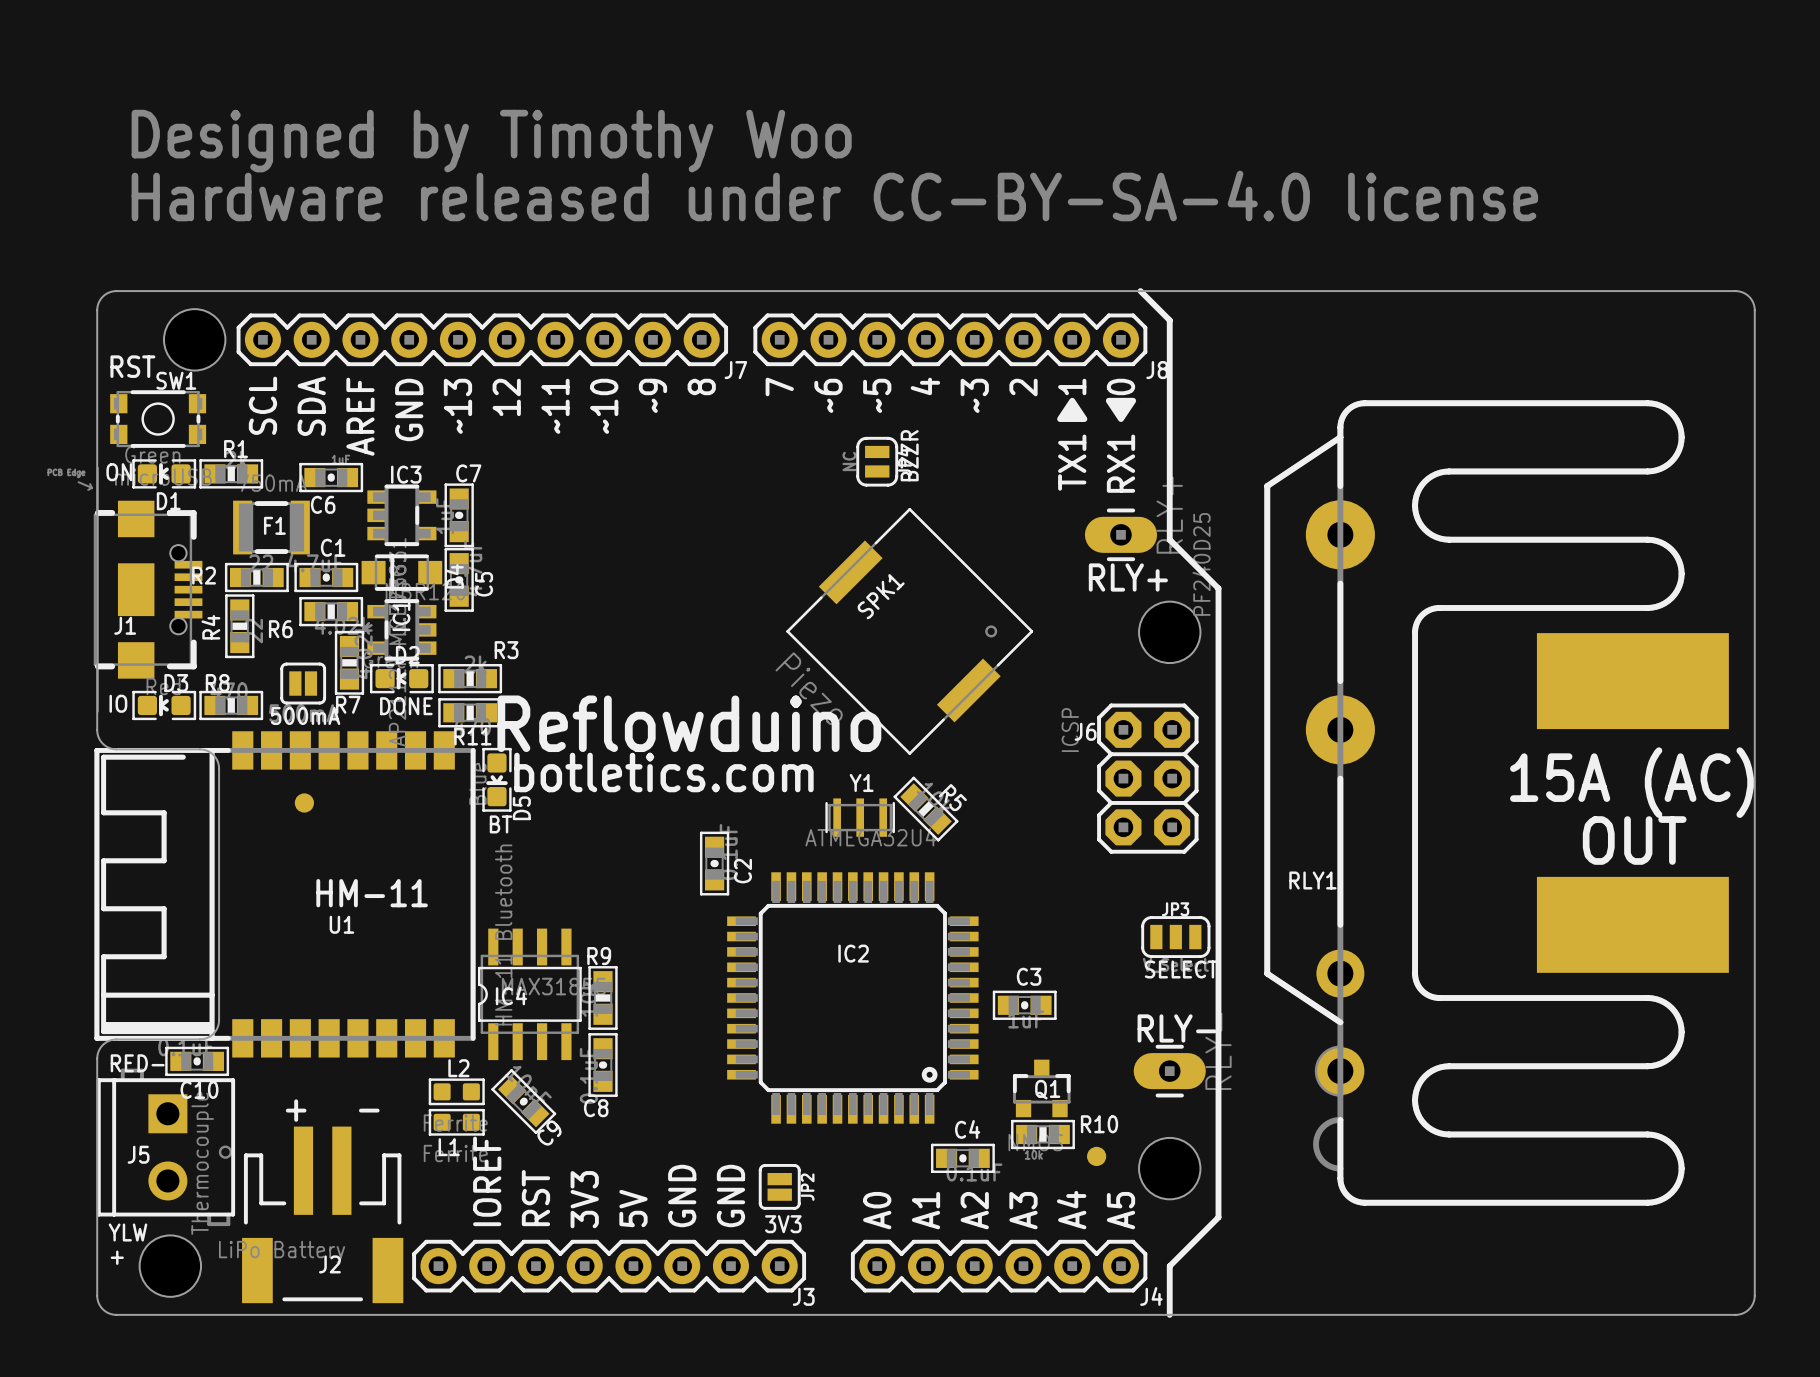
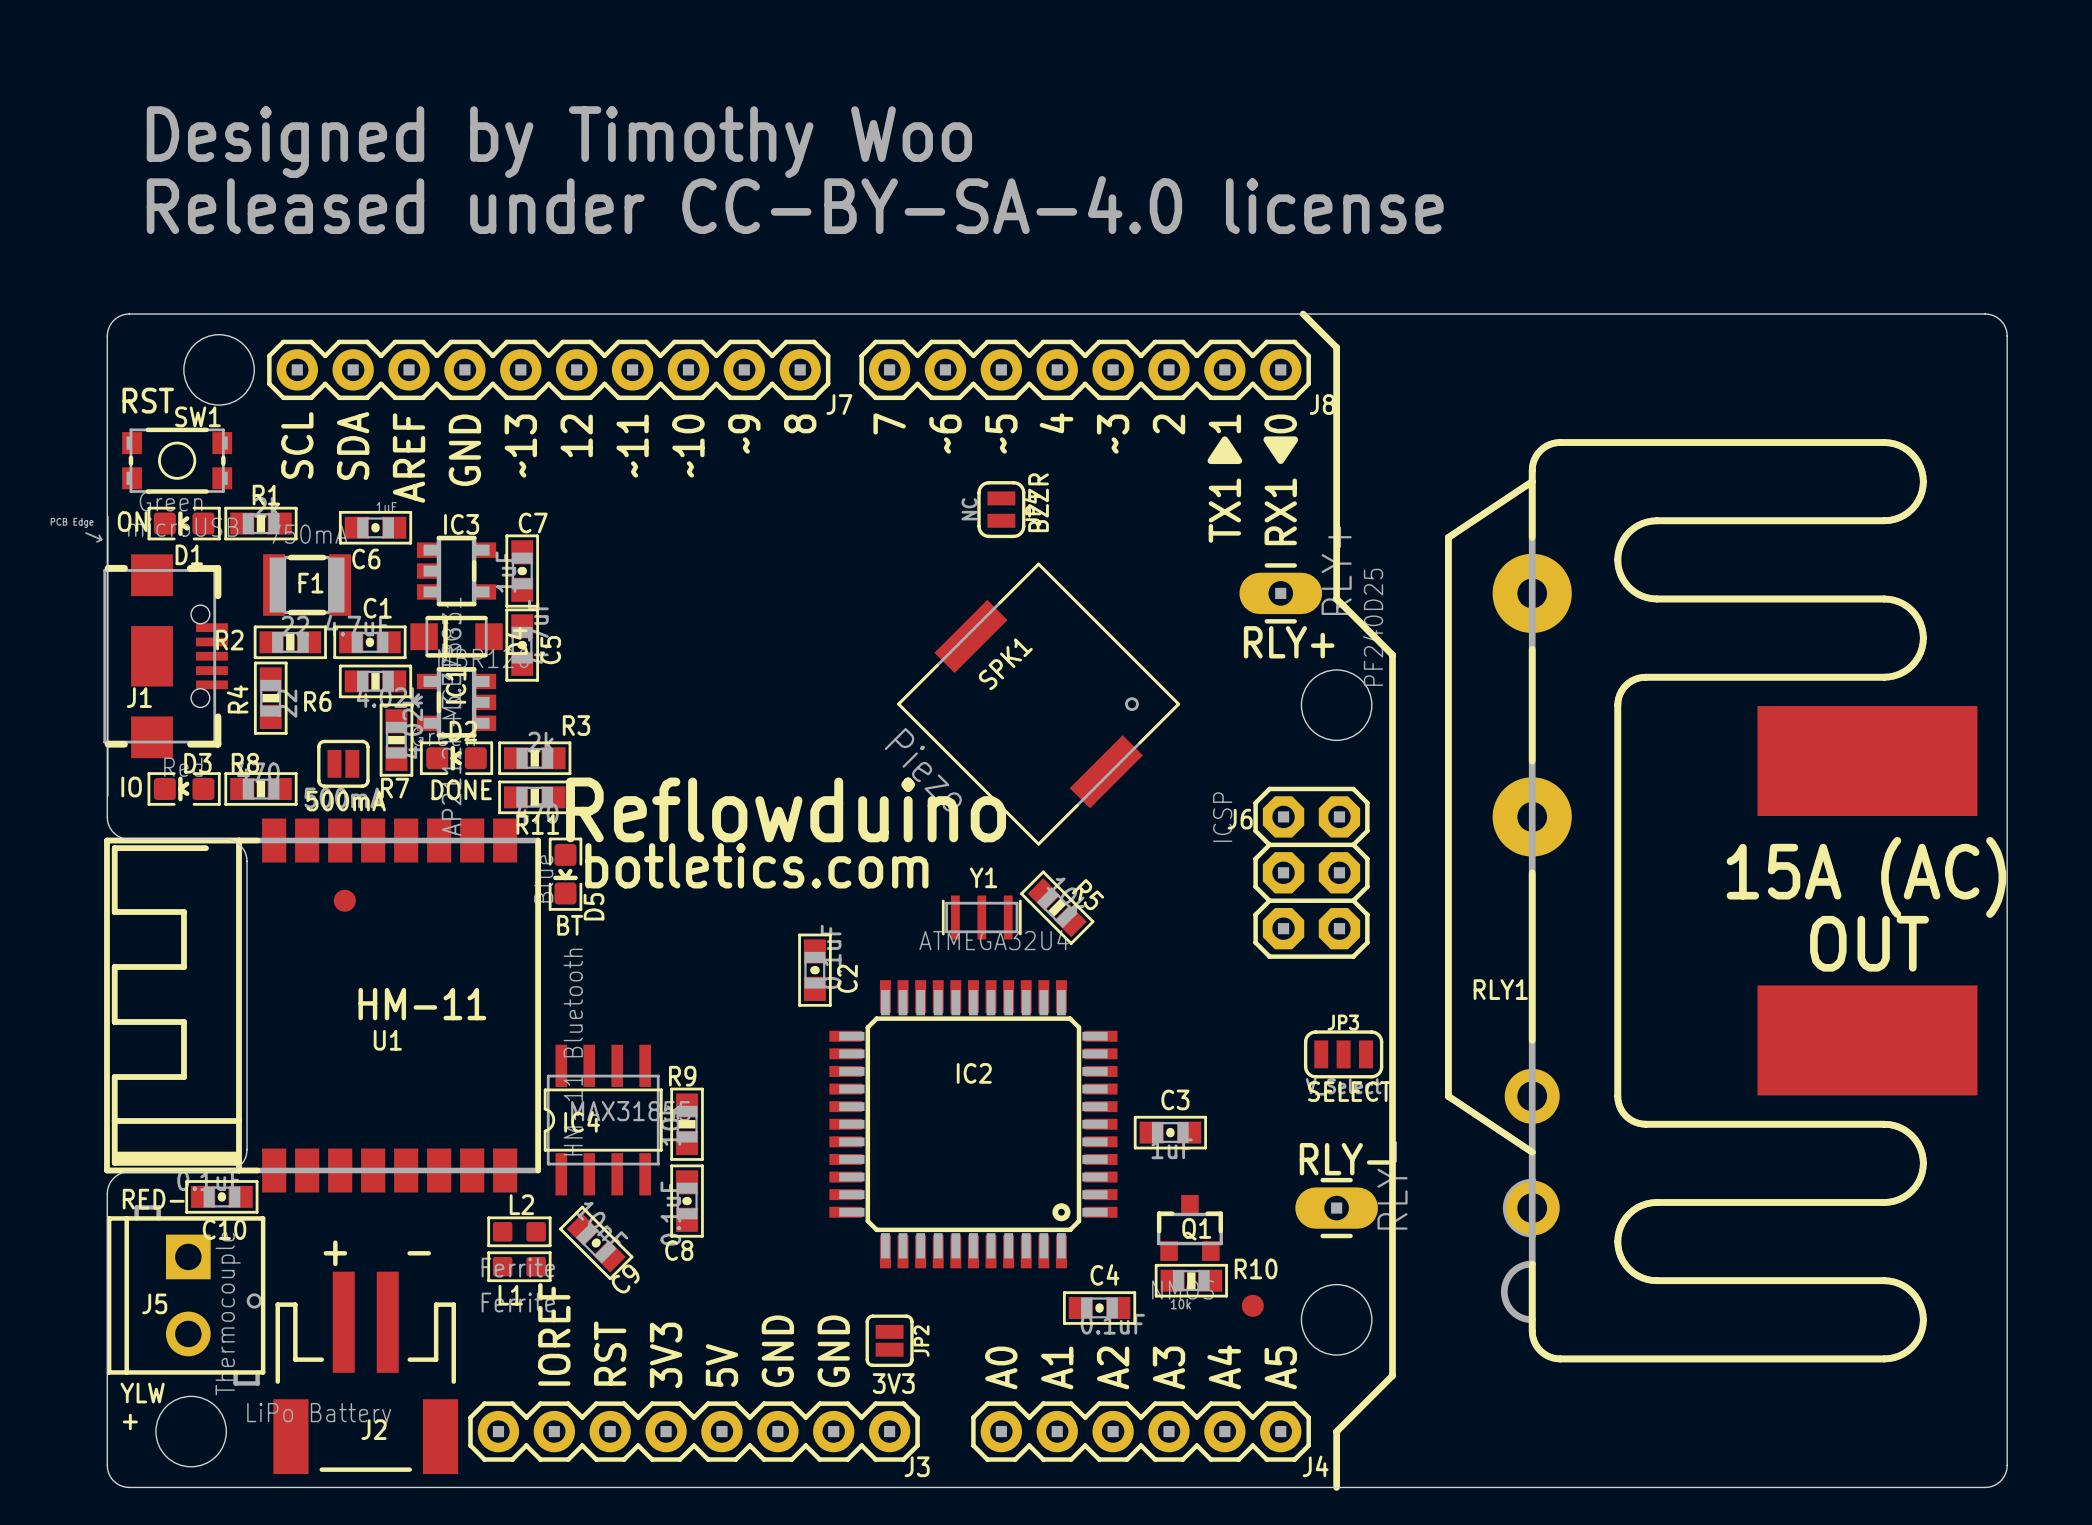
text: Hardware released under CC-BY-SA-4.0 license (834, 195) -> Released under CC-BY-SA-4.0 license (795, 205)

